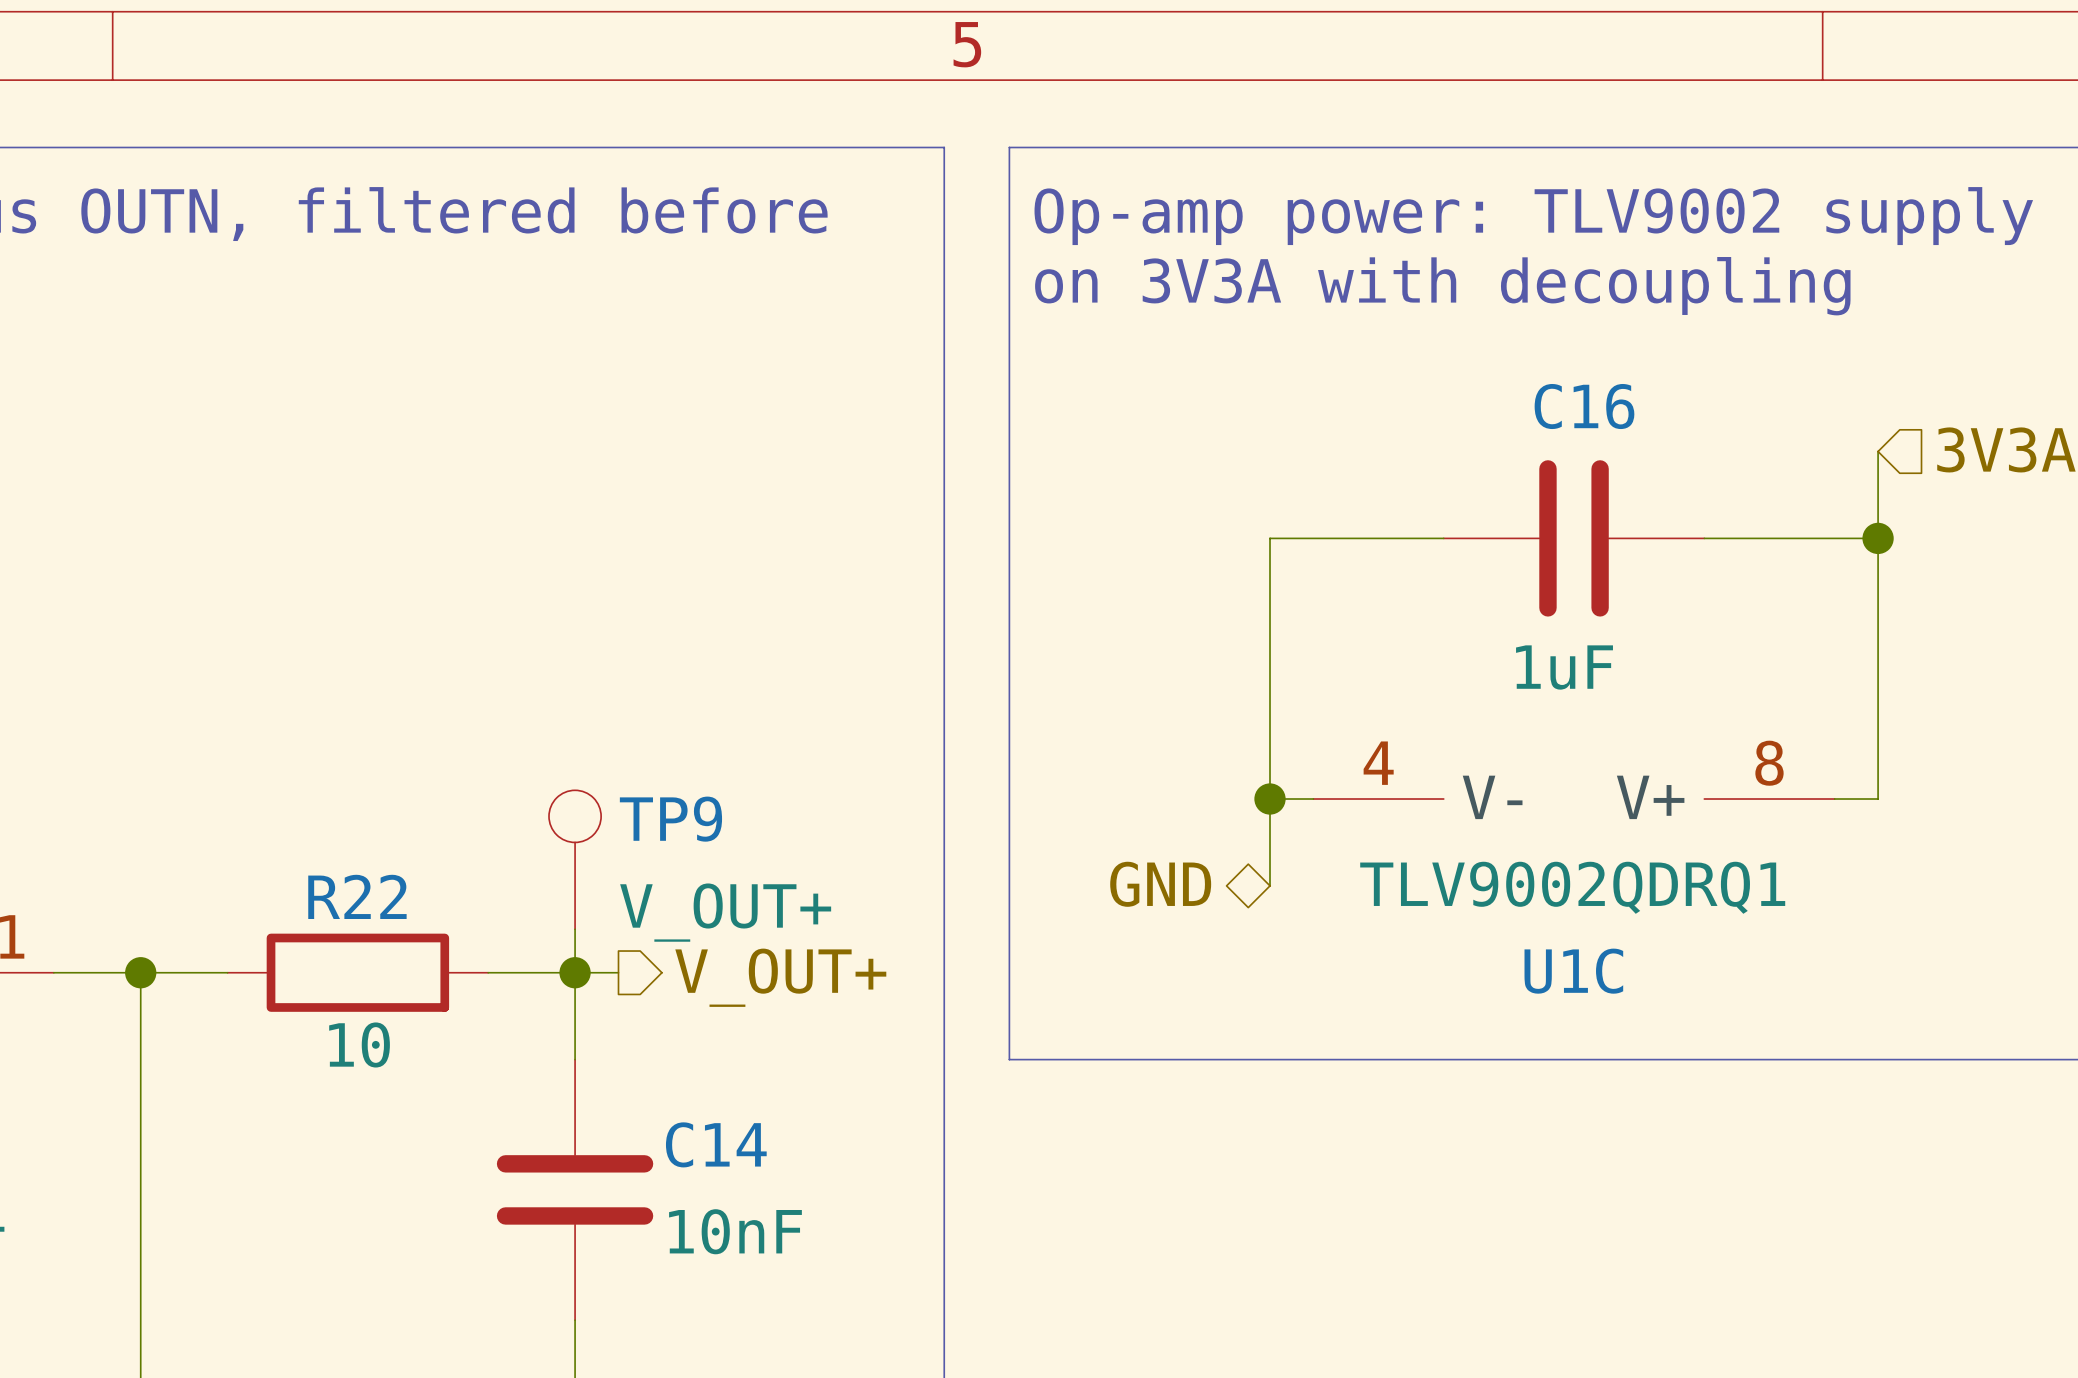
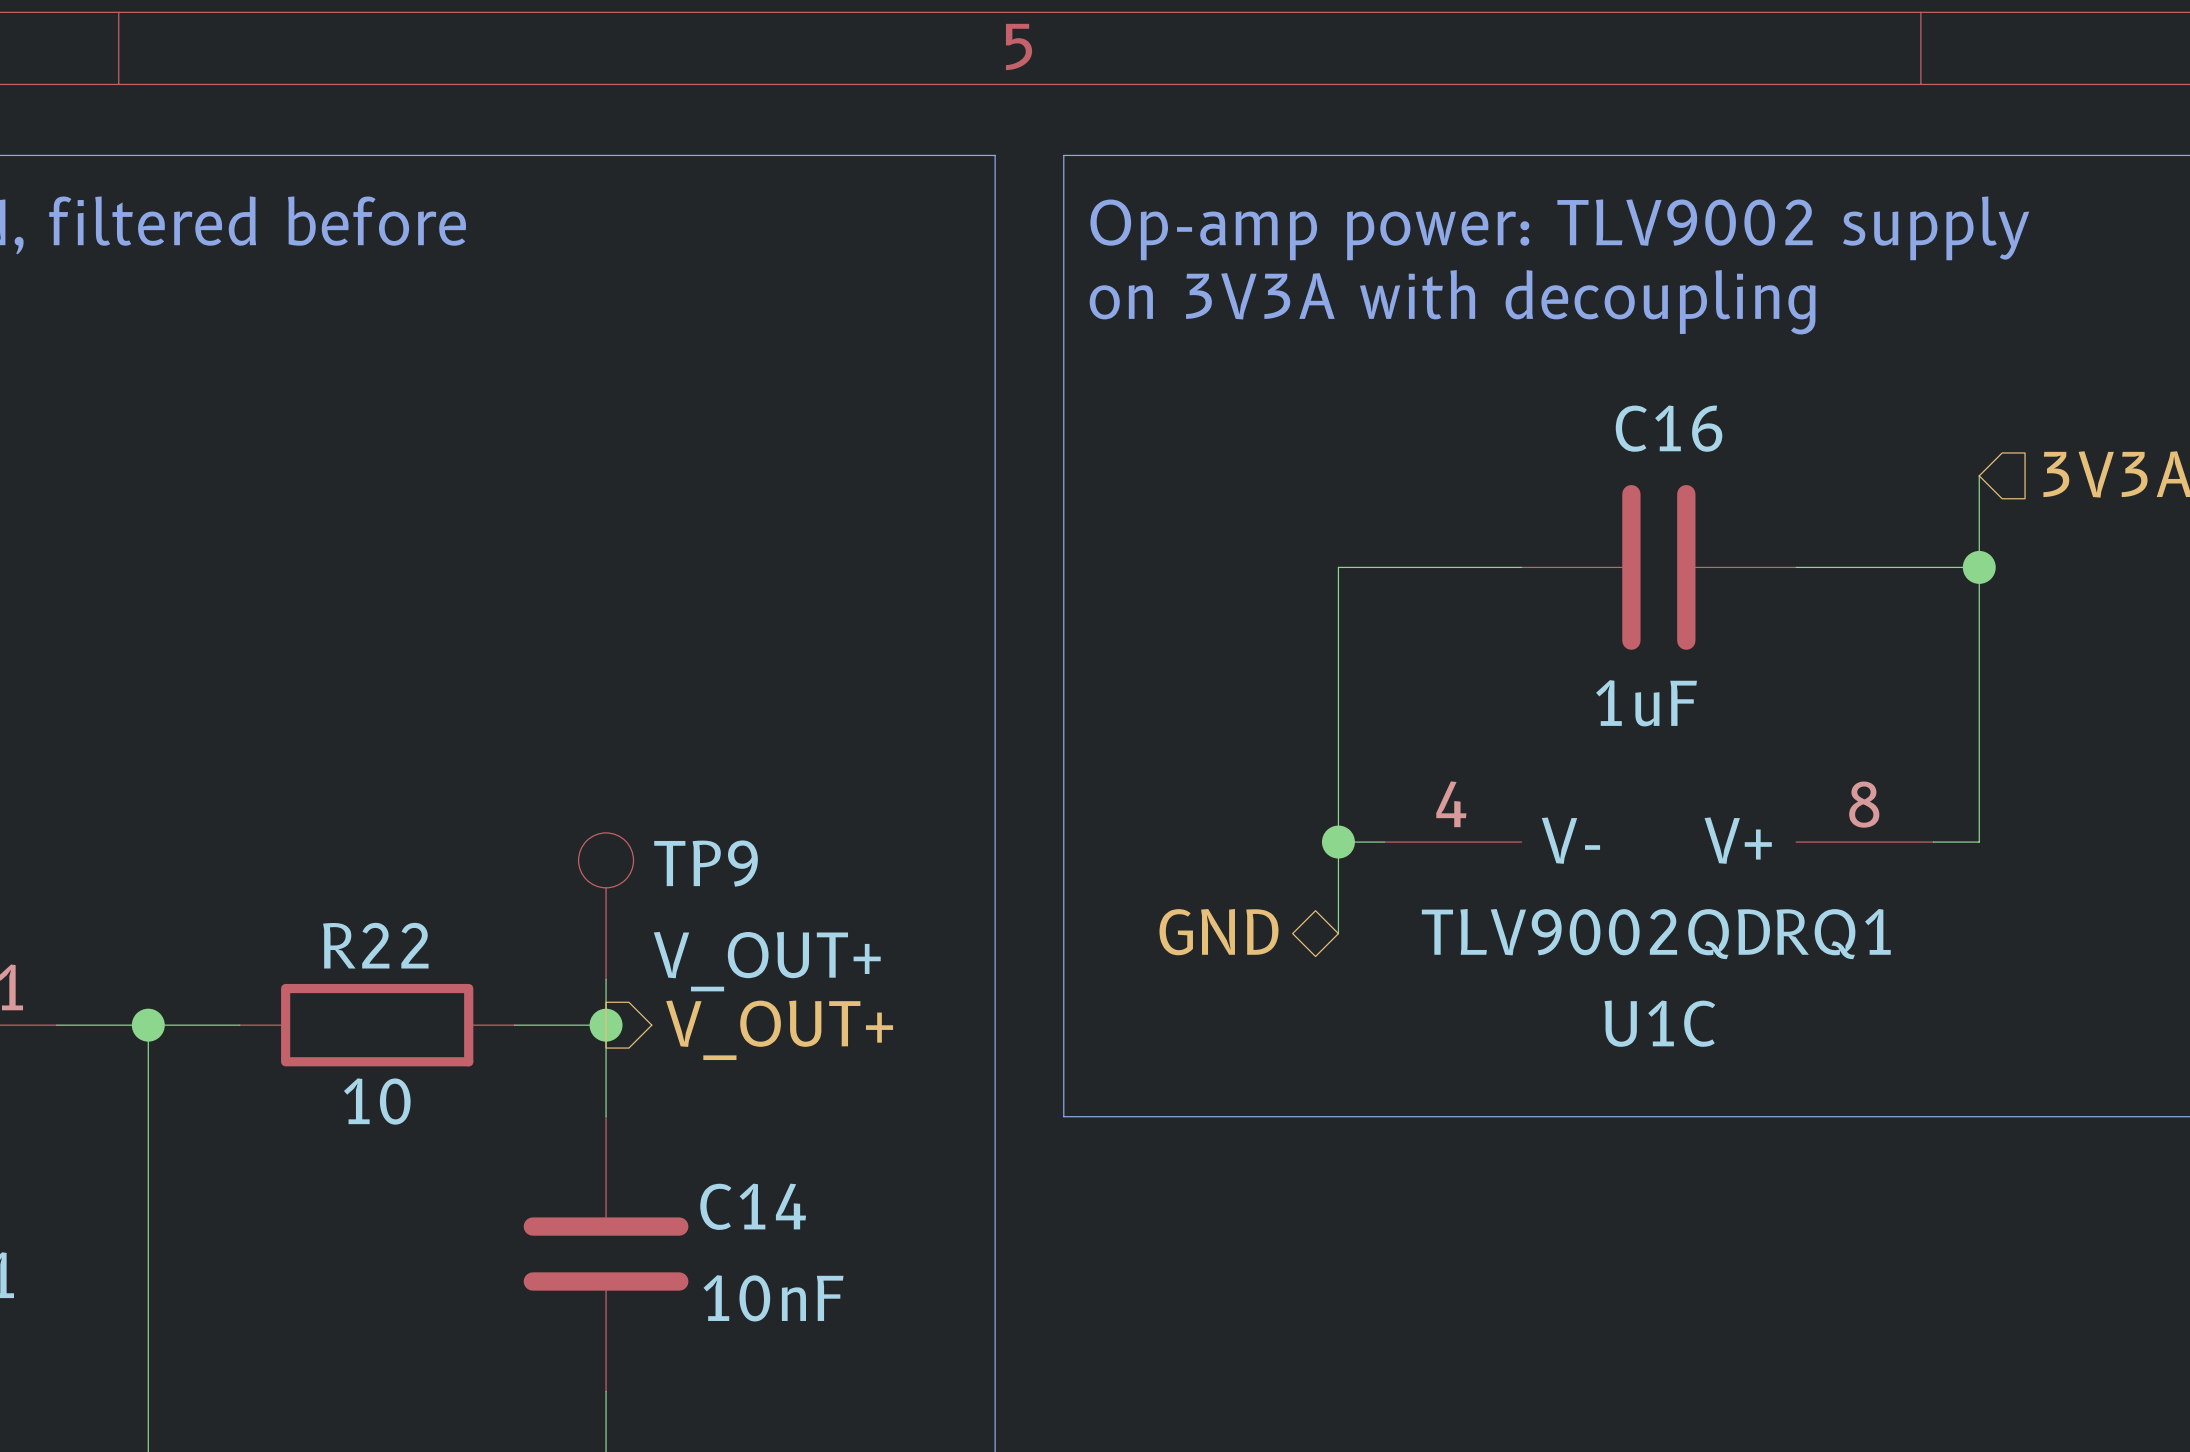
wire: (575, 972) (618, 972) -> none
hierarchical label position: V_OUT+ (780, 977) -> V_OUT+ (779, 1030)

